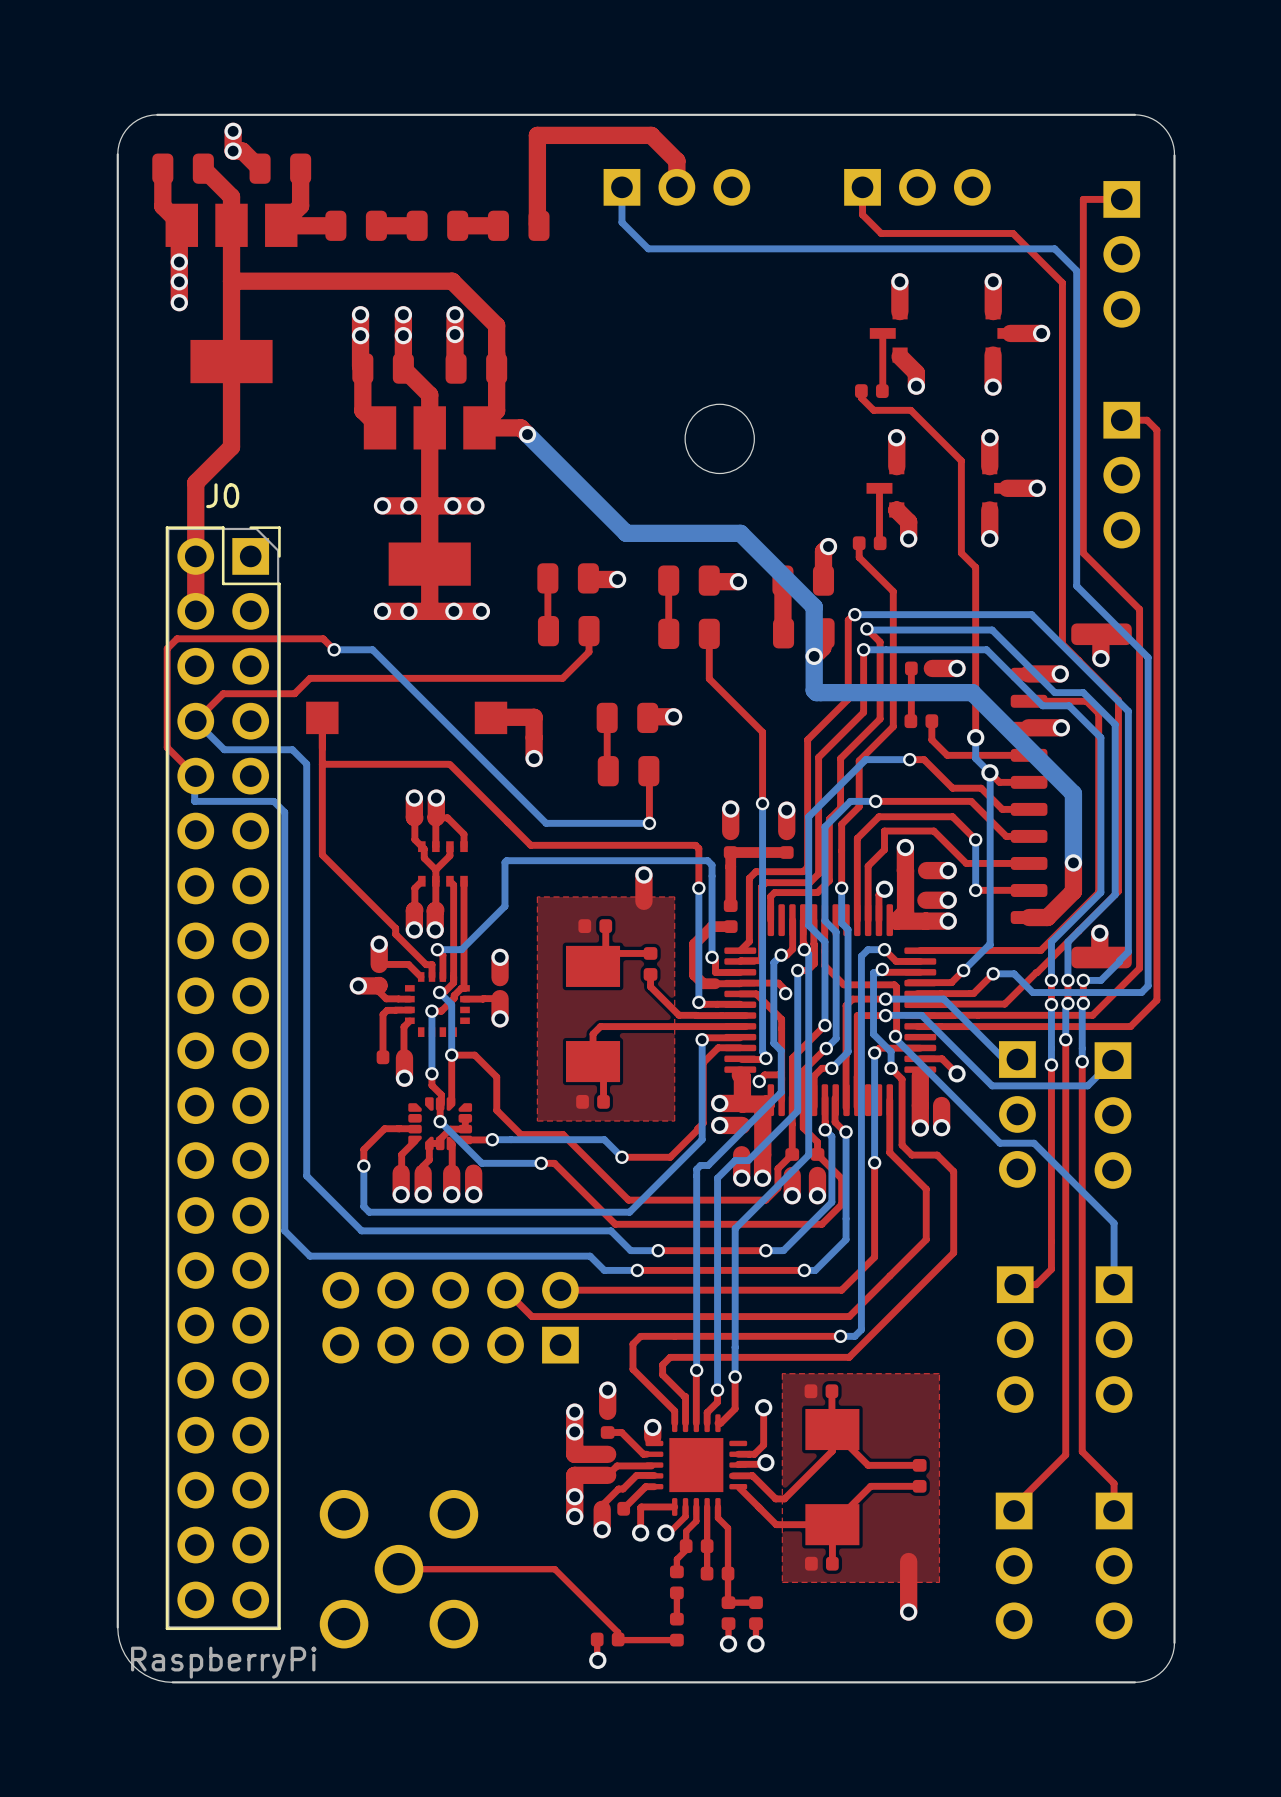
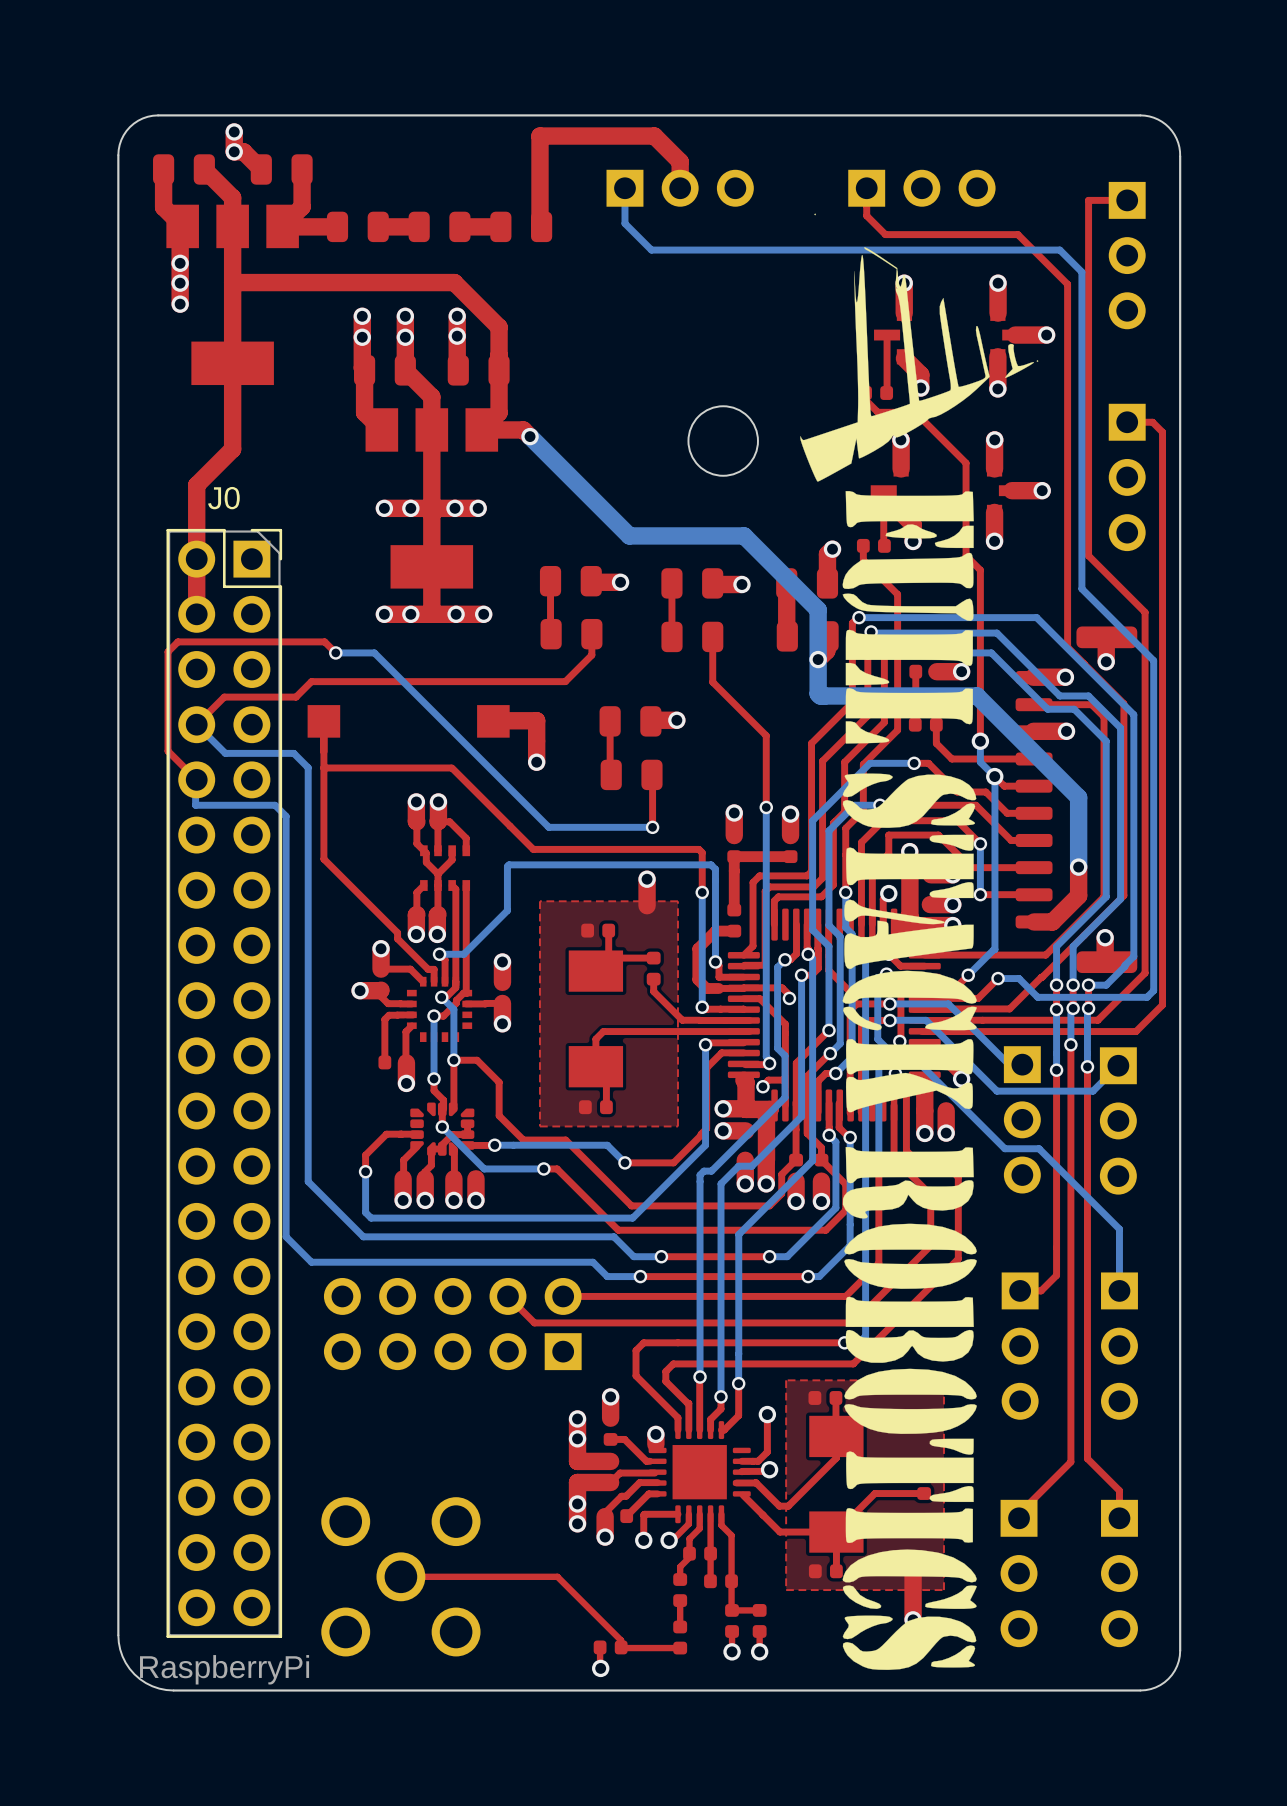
drawing: none -> [800, 213, 1039, 1670]

